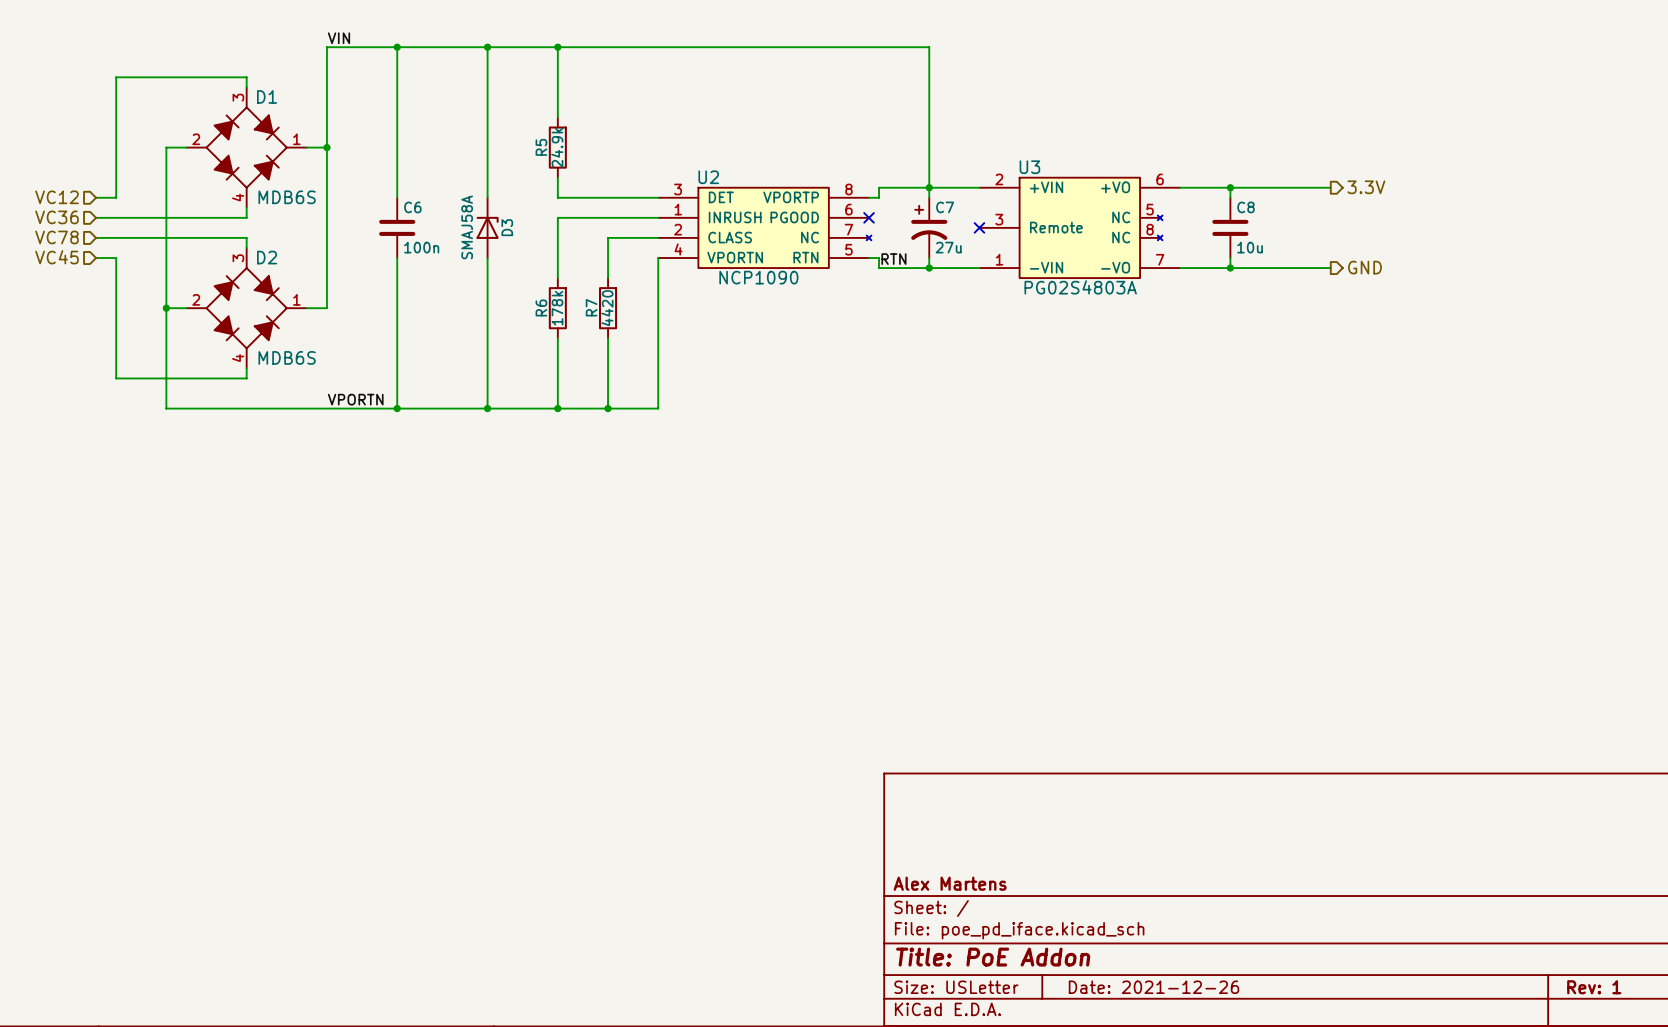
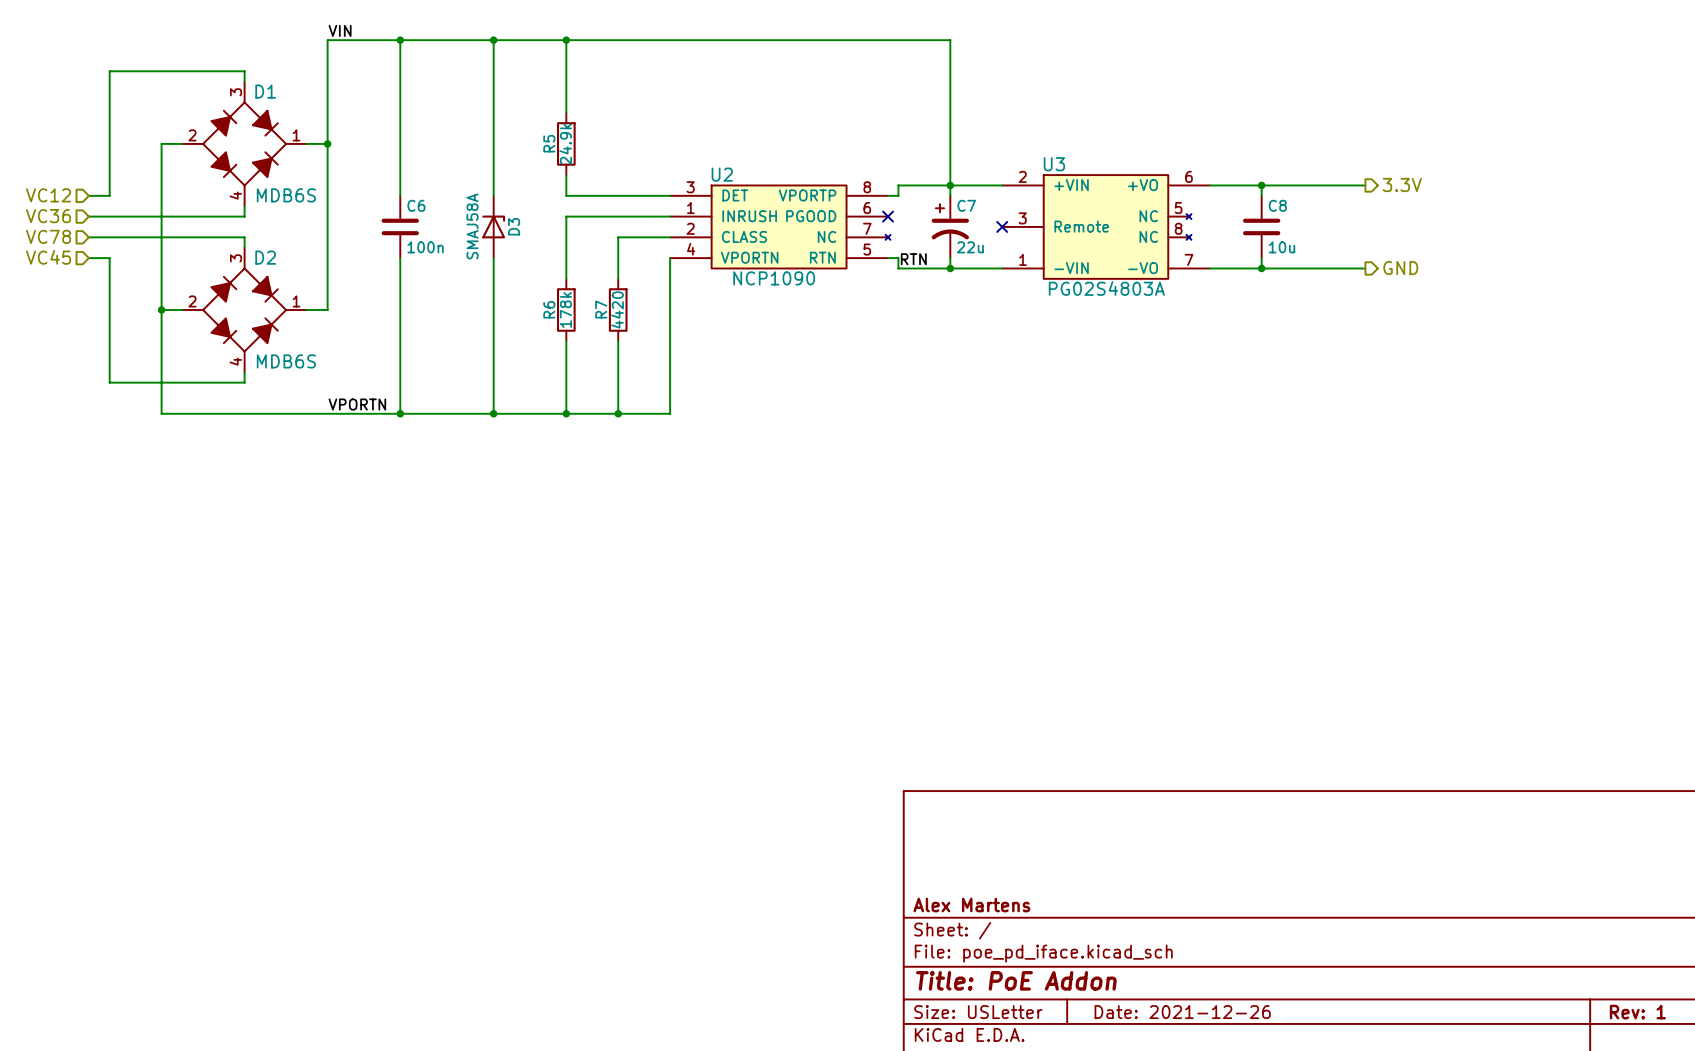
C7 value: 27u (948, 247) -> 22u (970, 247)

